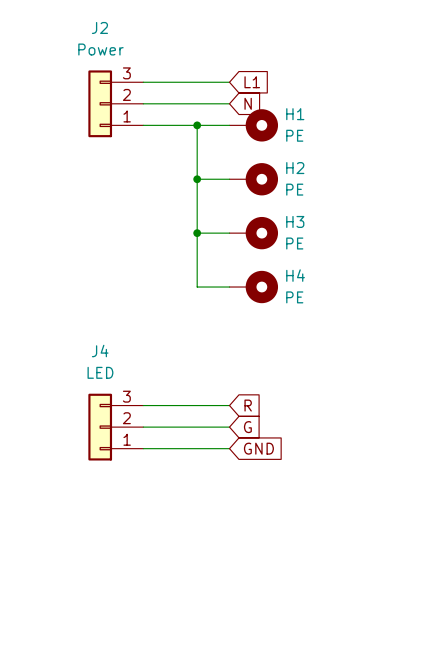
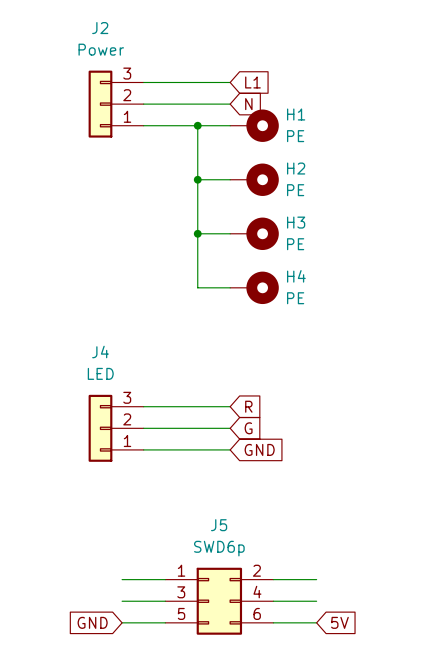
wire: none -> (122, 579) (165, 579)
wire: none -> (273, 579) (316, 579)
wire: none -> (122, 601) (165, 601)
J5: none -> SWD6p (219, 601)
wire: none -> (273, 601) (316, 601)
global label: none -> GND (92, 622)
wire: none -> (122, 622) (165, 622)
wire: none -> (273, 622) (316, 622)
global label: none -> 5V (339, 622)

